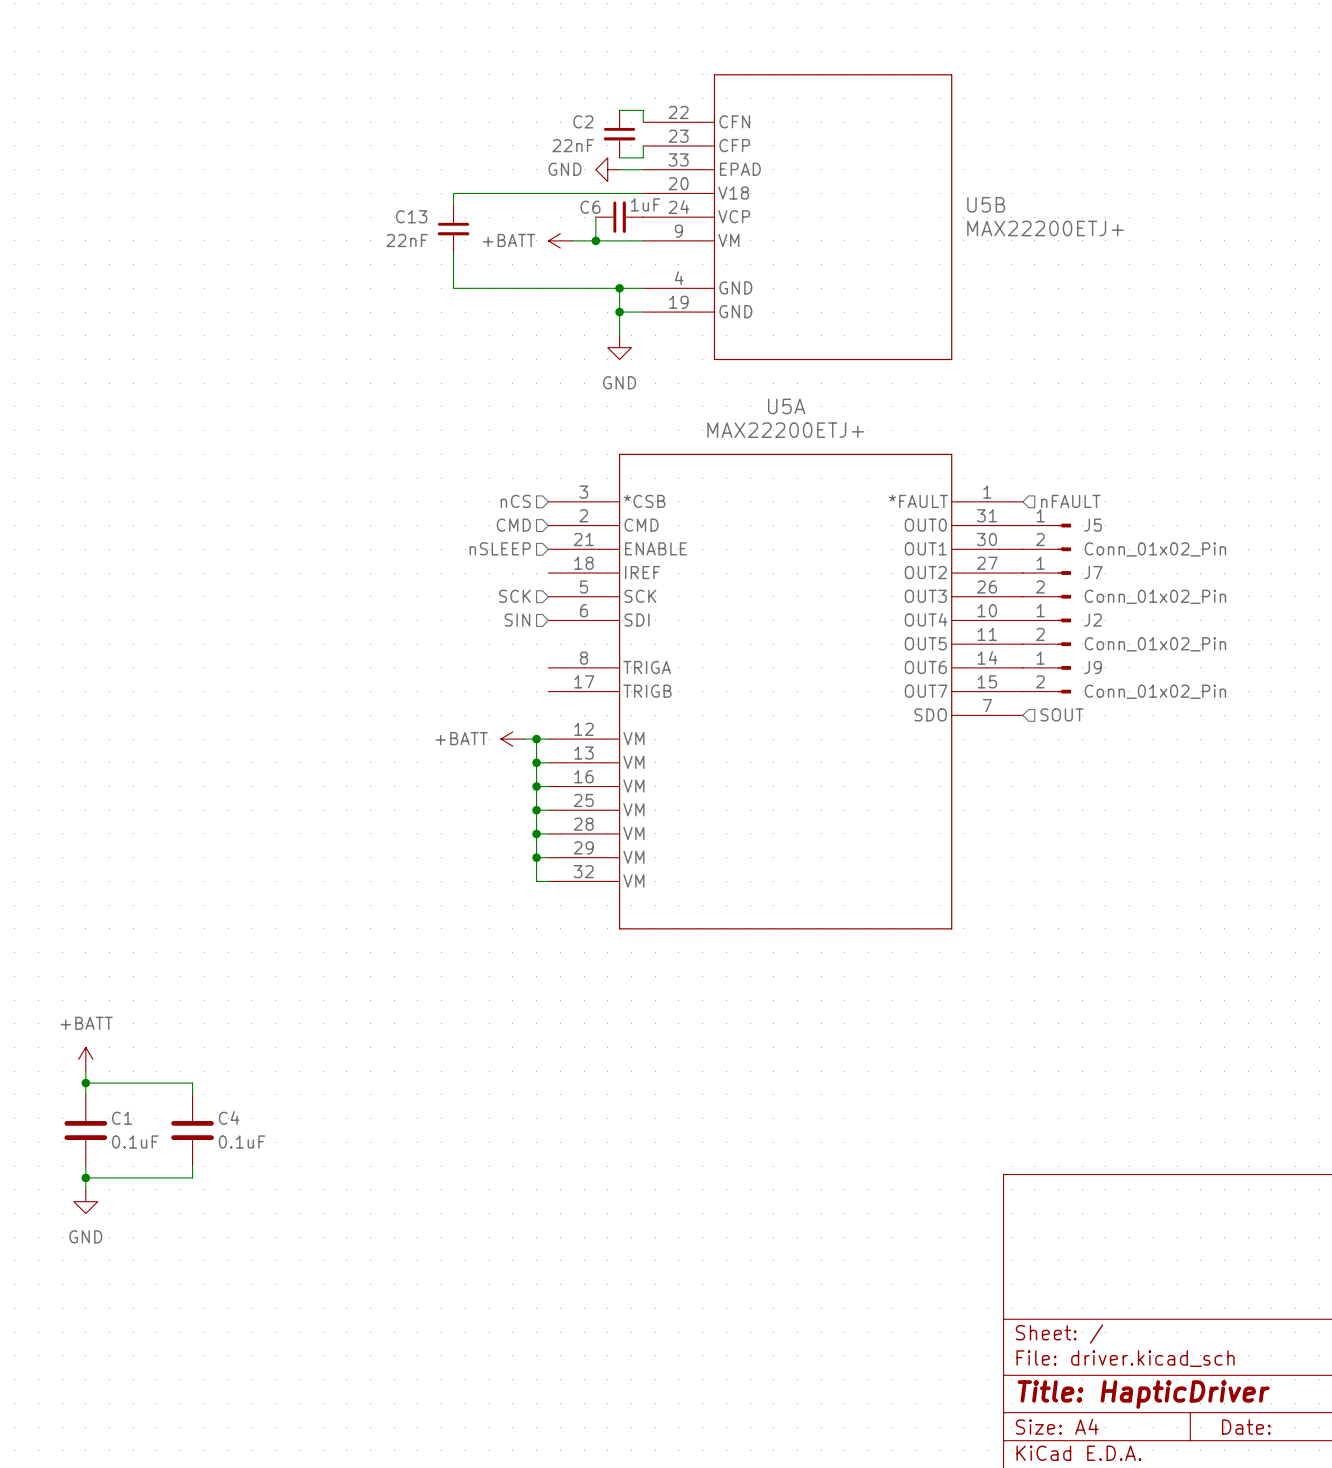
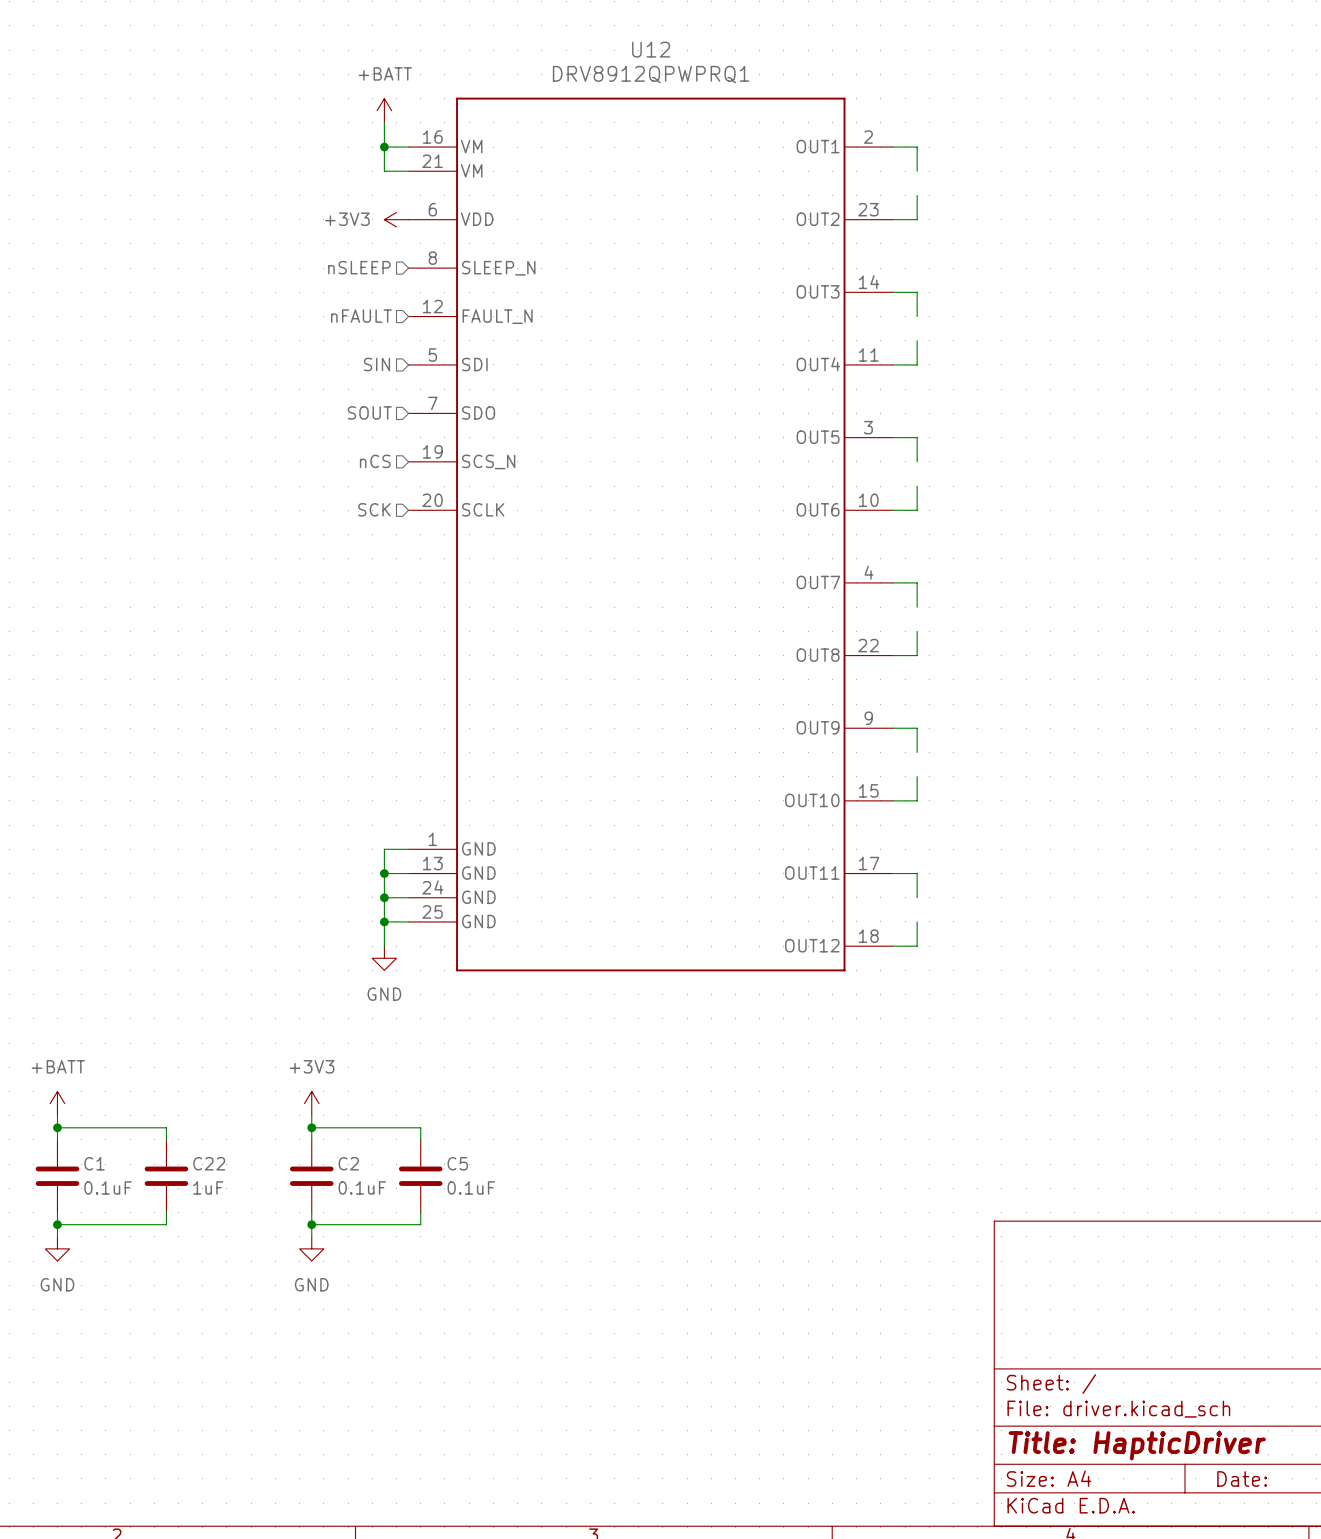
wire: none -> (384, 122) (384, 171) (408, 171)
C2 symbol: [603, 110, 636, 158] -> [289, 1139, 334, 1213]
wire: (619, 110) (643, 110) (643, 122) -> none
C2 name position: C2 (583, 121) -> C2 (348, 1163)
junction: none -> (384, 147)
wire: none -> (892, 147) (917, 147) (917, 171)
C2 value: 22nF (573, 145) -> 0.1uF (362, 1187)
wire: (643, 145) (643, 157) (619, 157) -> none
power symbol: GND (607, 169) -> none
wire: (619, 169) (643, 169) -> (384, 147) (408, 147)
wire: none -> (917, 195) (917, 219) (892, 219)
power symbol: none -> +3V3 (396, 219)
wire: (643, 193) (453, 193) (453, 205) -> none
wire: (595, 217) (595, 240) -> none
C6: 1uF (619, 217) -> none
U5B: MAX22200ETJ+ (797, 217) -> none
C13: 22nF (453, 229) -> none
hierarchical label: none -> nSLEEP (359, 267)
power symbol text position: +BATT (509, 240) -> +BATT (385, 73)
power symbol rotation: 0° (560, 240) -> 90° clockwise (384, 110)
power symbol position: +BATT (560, 240) -> +BATT (384, 110)
wire: (572, 240) (643, 240) -> none
junction: (595, 240) -> none
wire: (453, 252) (453, 288) (643, 288) -> none
wire: none -> (892, 292) (917, 292) (917, 316)
hierarchical label: none -> nFAULT (361, 316)
wire: (619, 288) (619, 335) -> none
junction: (619, 288) -> none
wire: (619, 312) (643, 312) -> none
junction: (619, 312) -> none
wire: none -> (917, 340) (917, 364) (892, 364)
hierarchical label: none -> SIN (377, 364)
power symbol: GND (619, 347) -> none
hierarchical label: none -> SOUT (369, 412)
wire: none -> (892, 437) (917, 437) (917, 461)
wire: none -> (917, 486) (917, 510) (892, 510)
hierarchical label position: nCS (515, 501) -> nCS (375, 461)
U12: none -> DRV8912QPWPRQ1 (650, 534)
hierarchical label: nFAULT (1070, 501) -> none
hierarchical label: CMD (513, 525) -> none
J5: Conn_01x02_Pin (1046, 537) -> none
hierarchical label: nSLEEP (500, 548) -> none
wire: none -> (892, 582) (917, 582) (917, 607)
J7: Conn_01x02_Pin (1046, 584) -> none
hierarchical label position: SCK (514, 596) -> SCK (374, 509)
wire: none -> (917, 631) (917, 655) (892, 655)
hierarchical label: SIN (517, 620) -> none
J2: Conn_01x02_Pin (1046, 632) -> none
J9: Conn_01x02_Pin (1046, 679) -> none
U5A: MAX22200ETJ+ (785, 691) -> none
wire: none -> (892, 728) (917, 728) (917, 752)
hierarchical label: SOUT (1062, 714) -> none
power symbol: +BATT (512, 739) -> none
wire: (524, 739) (548, 739) -> (384, 873) (408, 873)
wire: (536, 739) (536, 881) (548, 881) -> none
junction: (536, 739) -> none
wire: none -> (917, 776) (917, 800) (892, 800)
wire: (536, 762) (548, 762) -> none
junction: (536, 762) -> none
wire: (536, 786) (548, 786) -> none
junction: (536, 786) -> none
wire: none -> (408, 849) (384, 849) (384, 946)
wire: (536, 810) (548, 810) -> none
junction: (536, 810) -> none
junction: none -> (384, 873)
wire: (536, 833) (548, 833) -> none
junction: (536, 833) -> none
wire: none -> (892, 873) (917, 873) (917, 897)
wire: none -> (384, 897) (408, 897)
junction: none -> (384, 897)
wire: (536, 857) (548, 857) -> none
junction: (536, 857) -> none
wire: none -> (384, 921) (408, 921)
junction: none -> (384, 921)
wire: none -> (917, 921) (917, 946) (892, 946)
power symbol: none -> GND (384, 958)
power symbol: none -> +3V3 (311, 1103)
wire: none -> (311, 1115) (311, 1139)
wire: none -> (311, 1127) (420, 1127) (420, 1139)
junction: none -> (311, 1127)
C4 name: C4 (229, 1117) -> C22 (209, 1163)
C5: none -> 0.1uF (420, 1176)
C4 value: 0.1uF (242, 1141) -> 1uF (208, 1187)
wire: none -> (311, 1212) (311, 1236)
wire: none -> (420, 1212) (420, 1224) (311, 1224)
junction: none -> (311, 1224)
power symbol: none -> GND (311, 1248)

